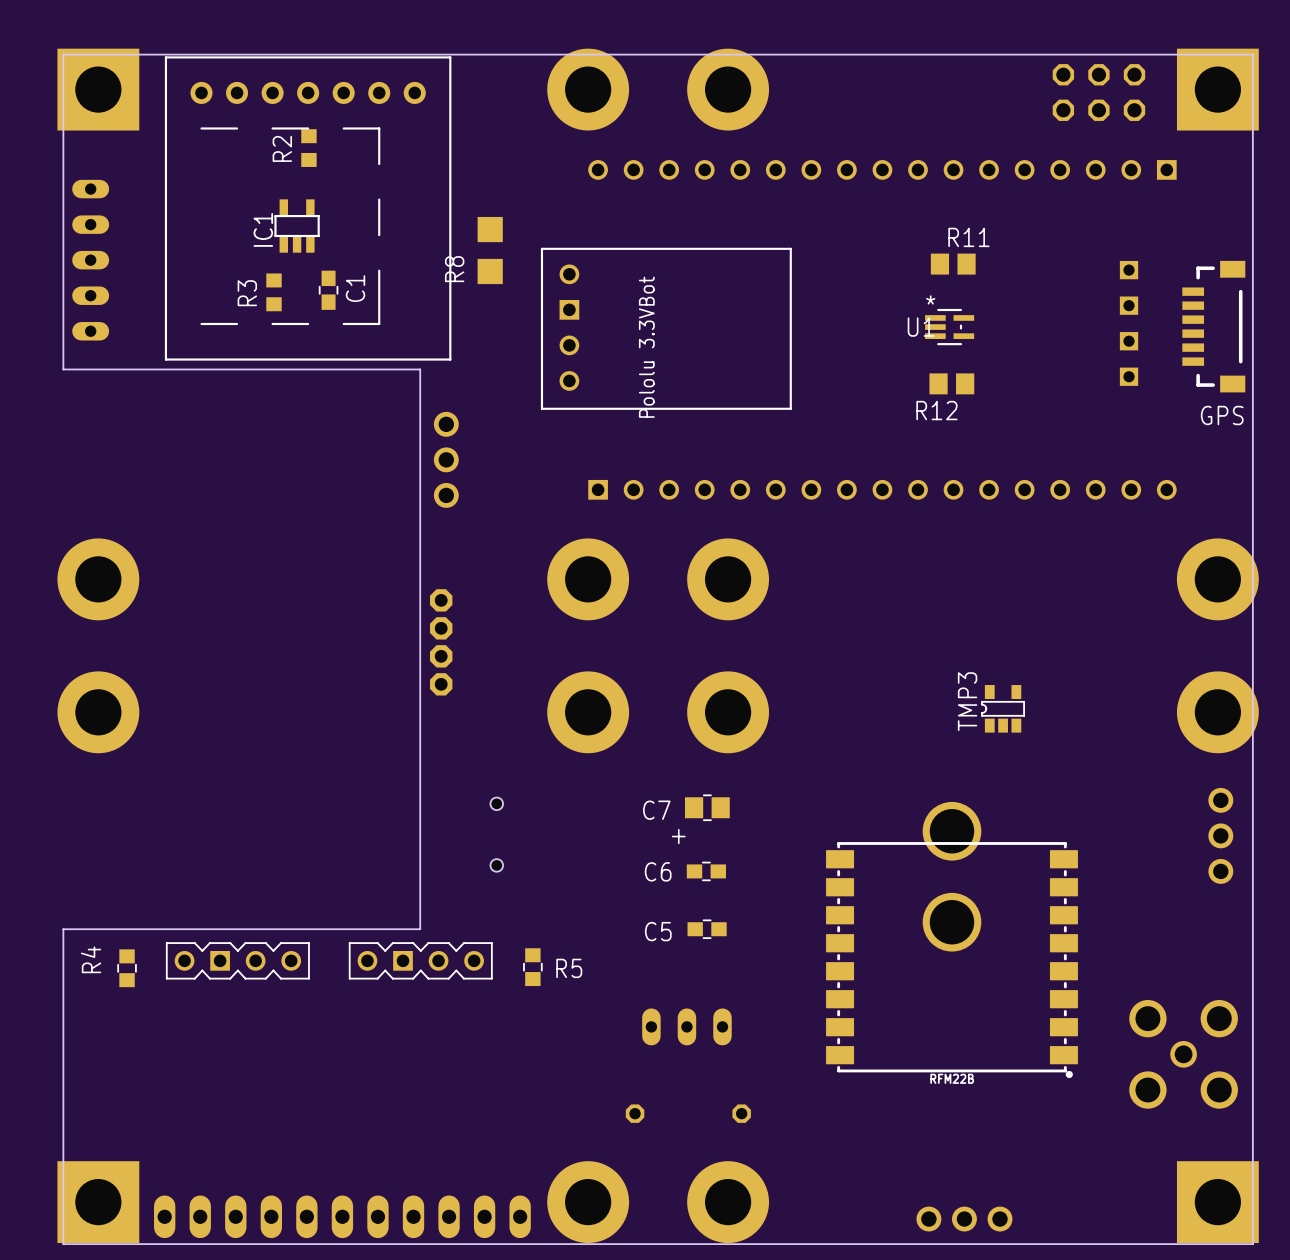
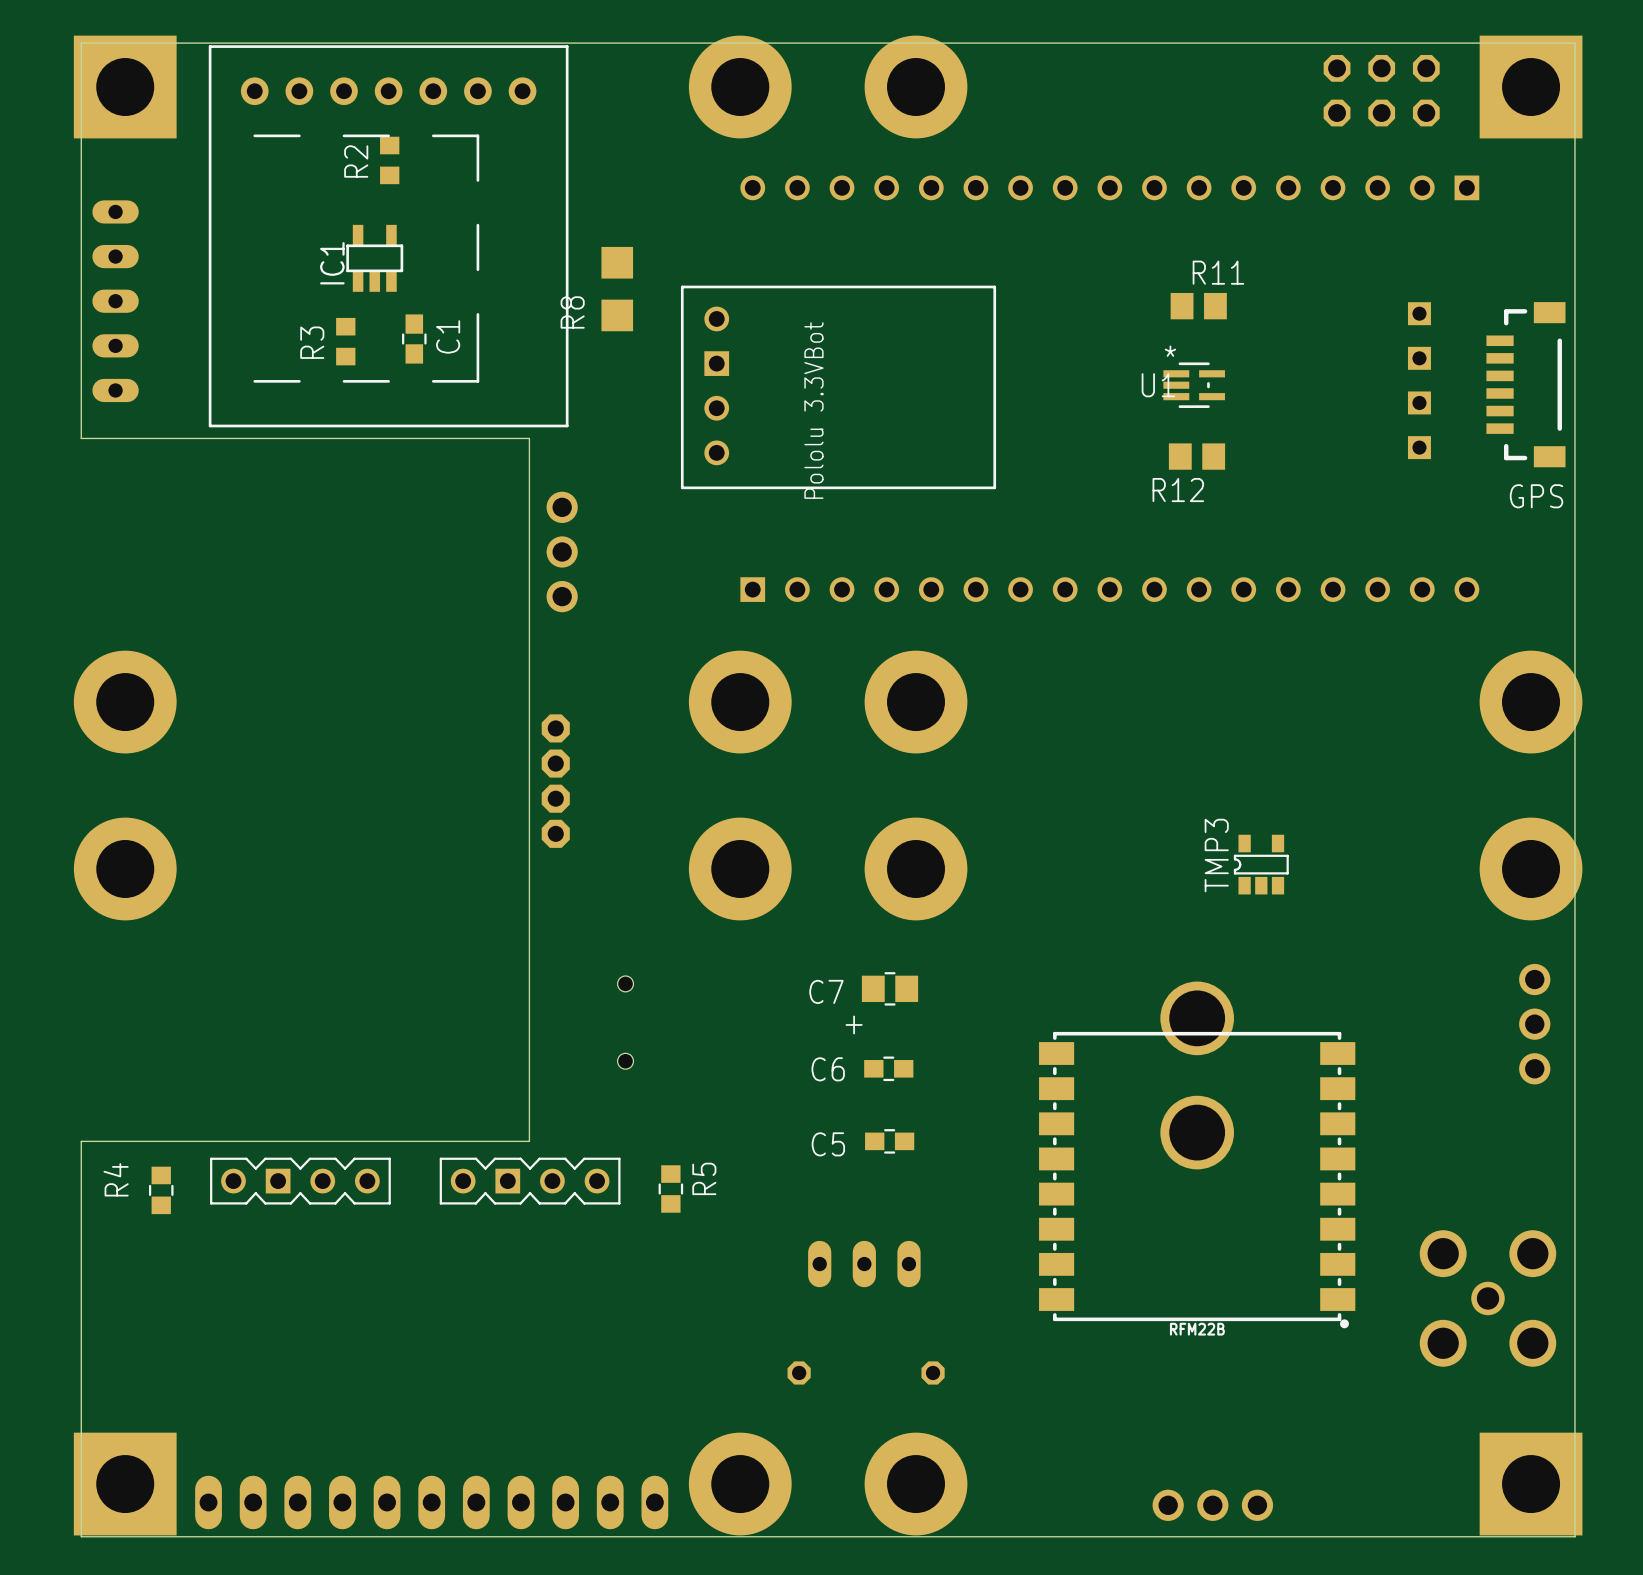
R5 name rotation: 0° (569, 968) -> 90° counterclockwise (704, 1178)

